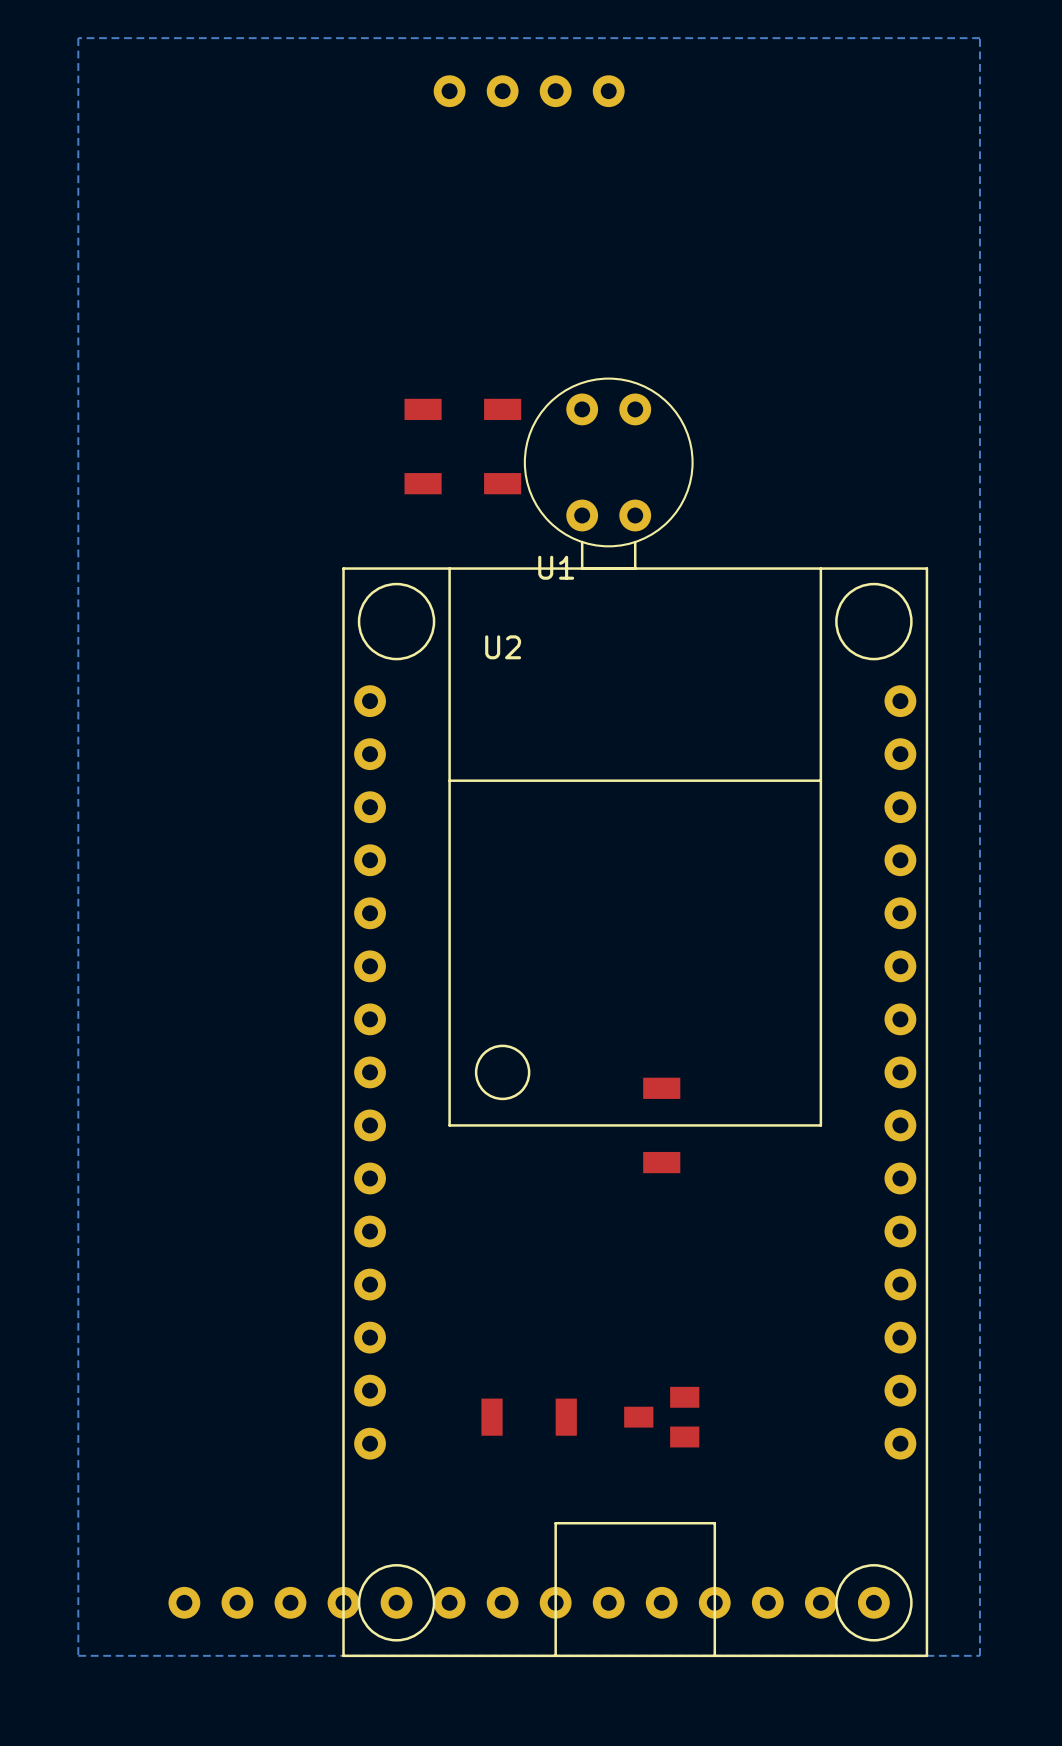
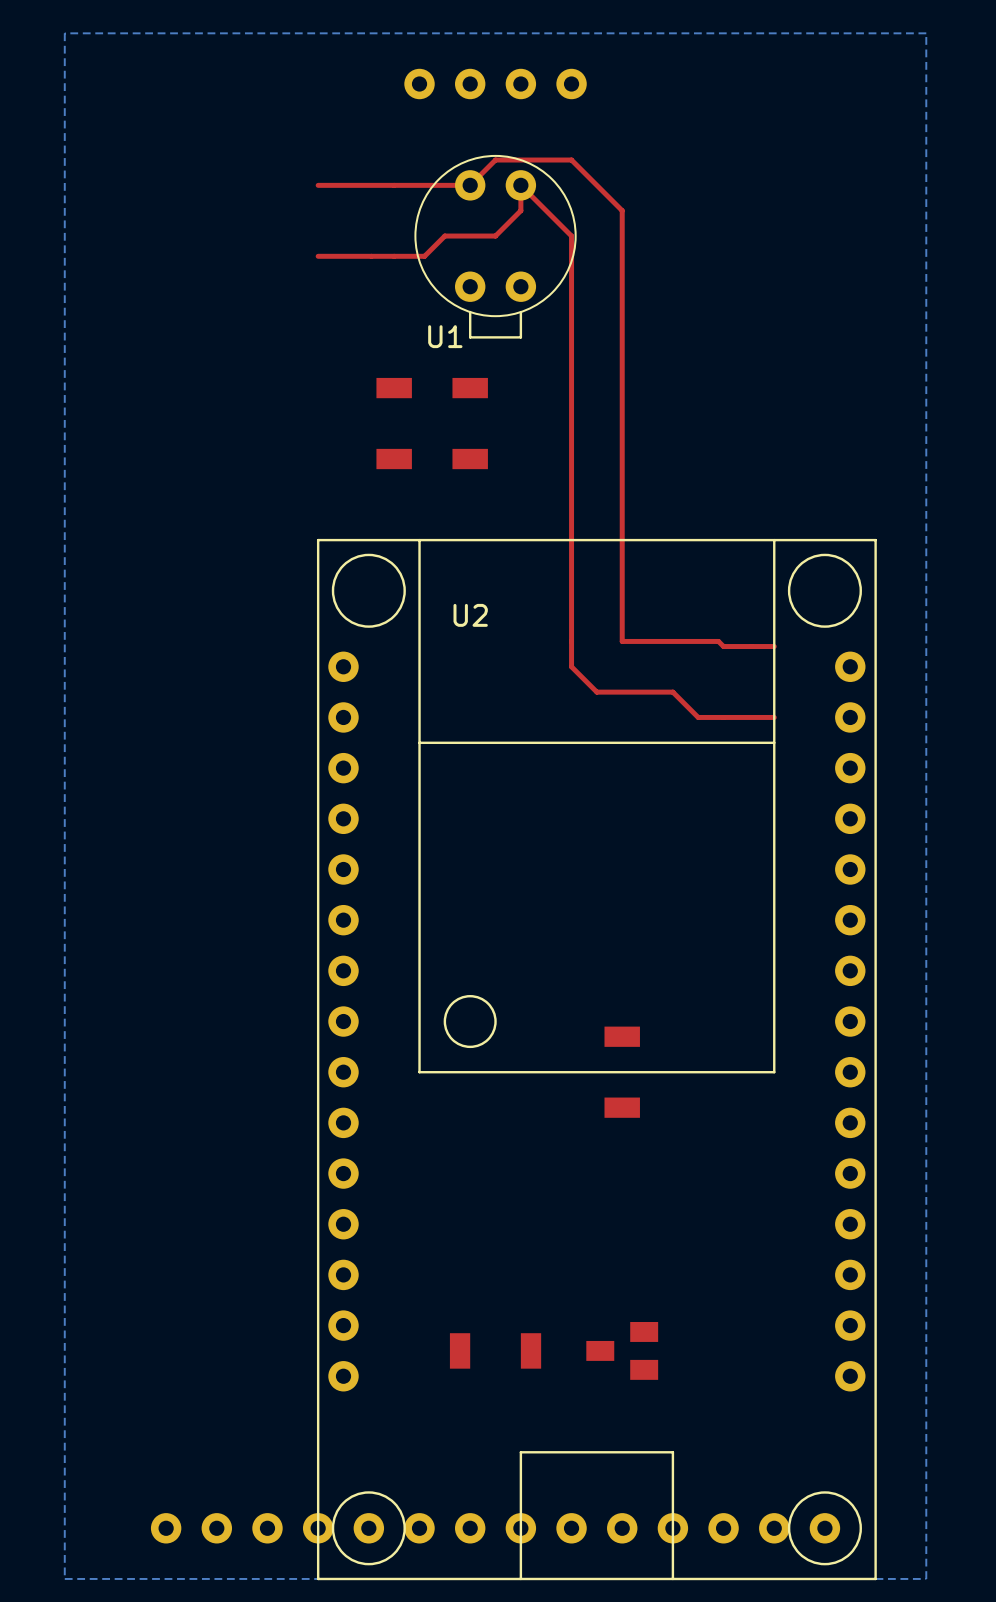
top track: none -> (318, 185) (470, 185) (495, 160) (571, 160) (622, 210) (622, 641) (718, 641) (723, 646) (774, 646)
top track: none -> (318, 256) (424, 256) (444, 236) (495, 236) (520, 210) (520, 185) (571, 236) (571, 666) (596, 692) (672, 692) (698, 717) (774, 717)
U1 position: (608, 473) -> (495, 246)

